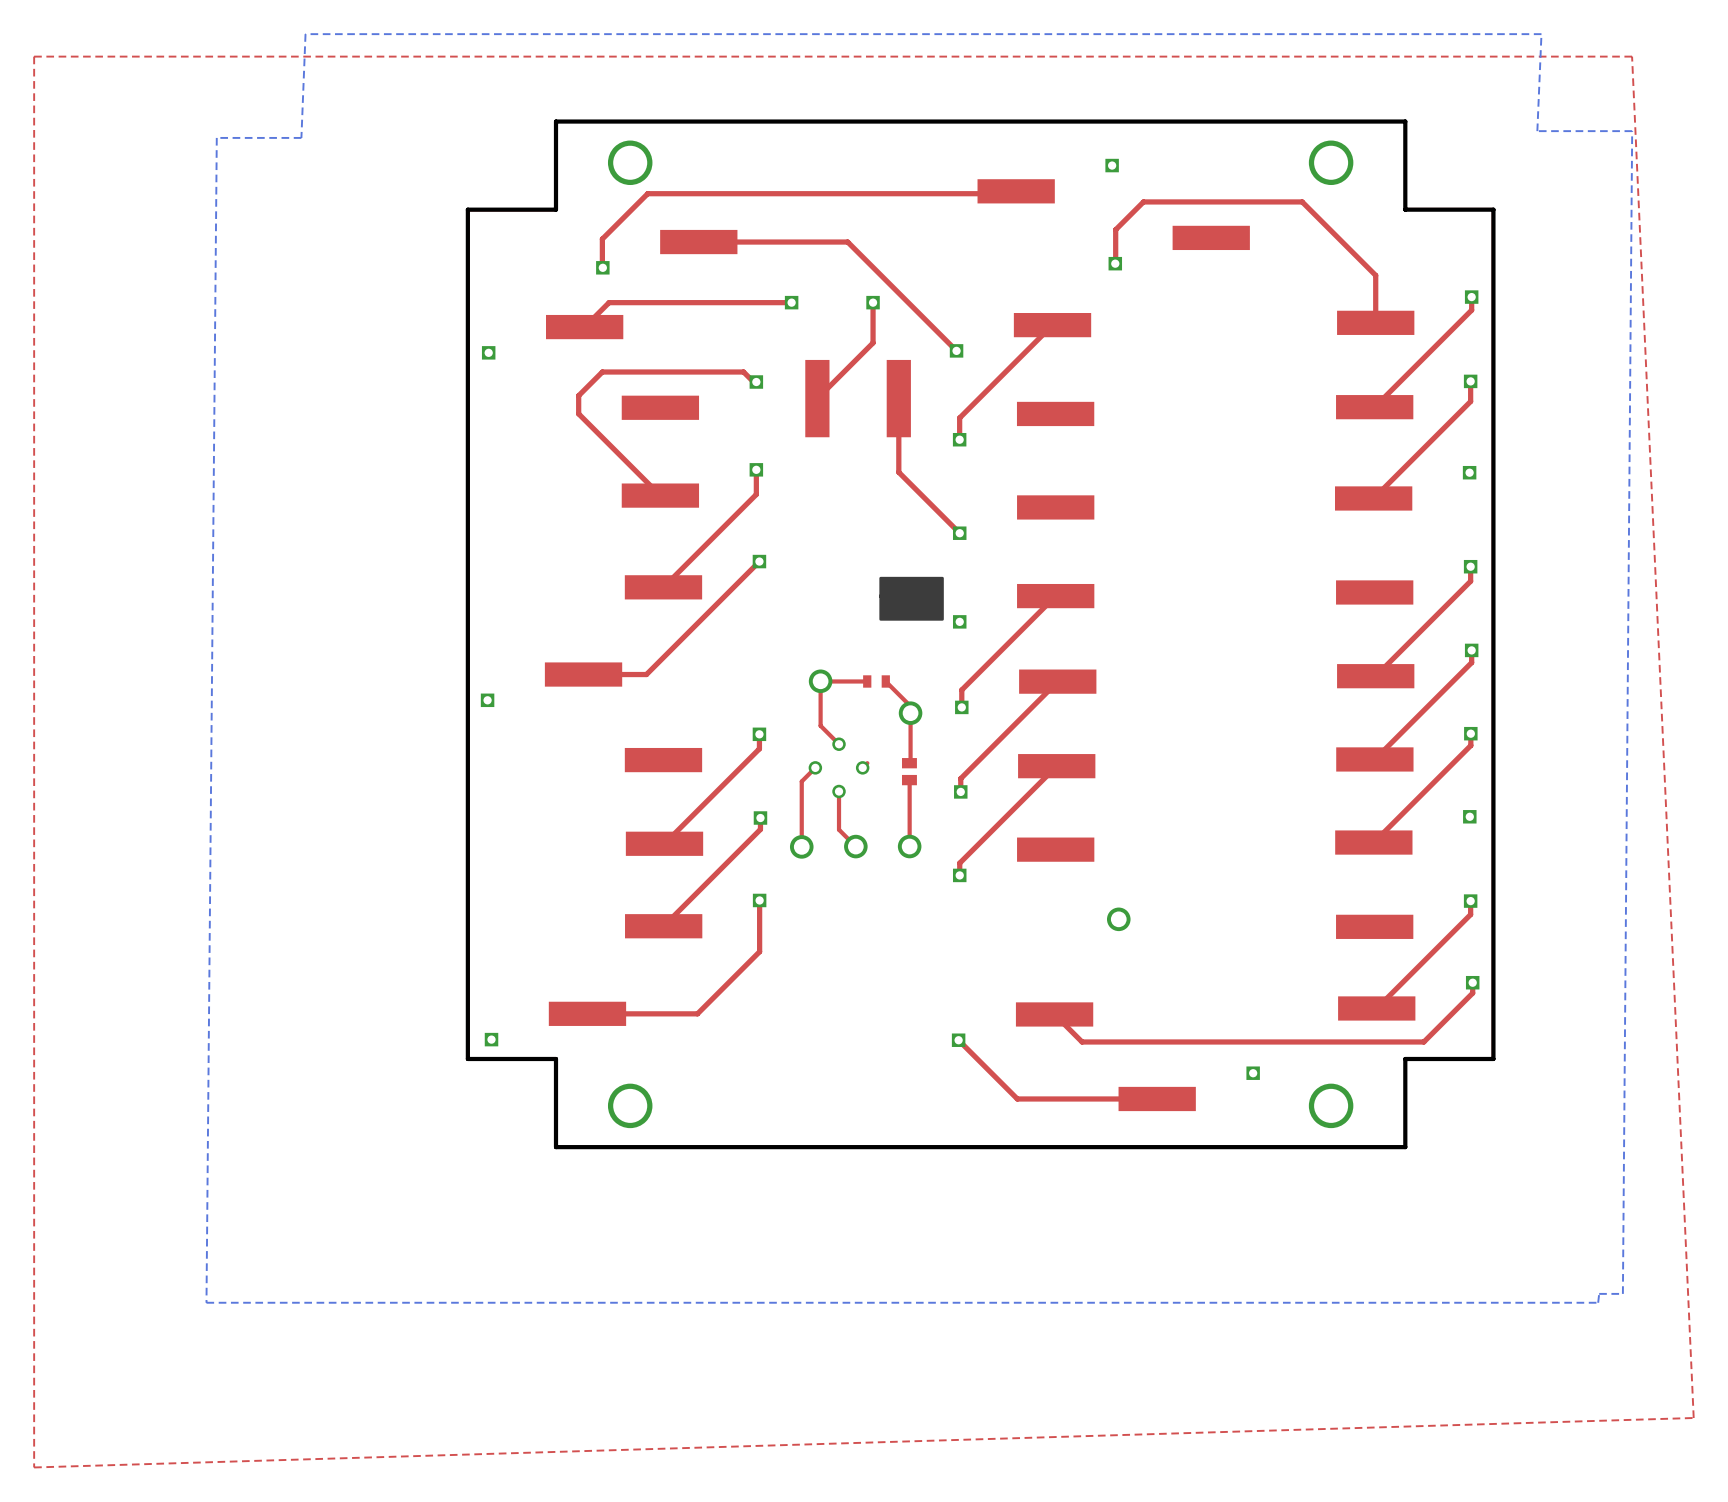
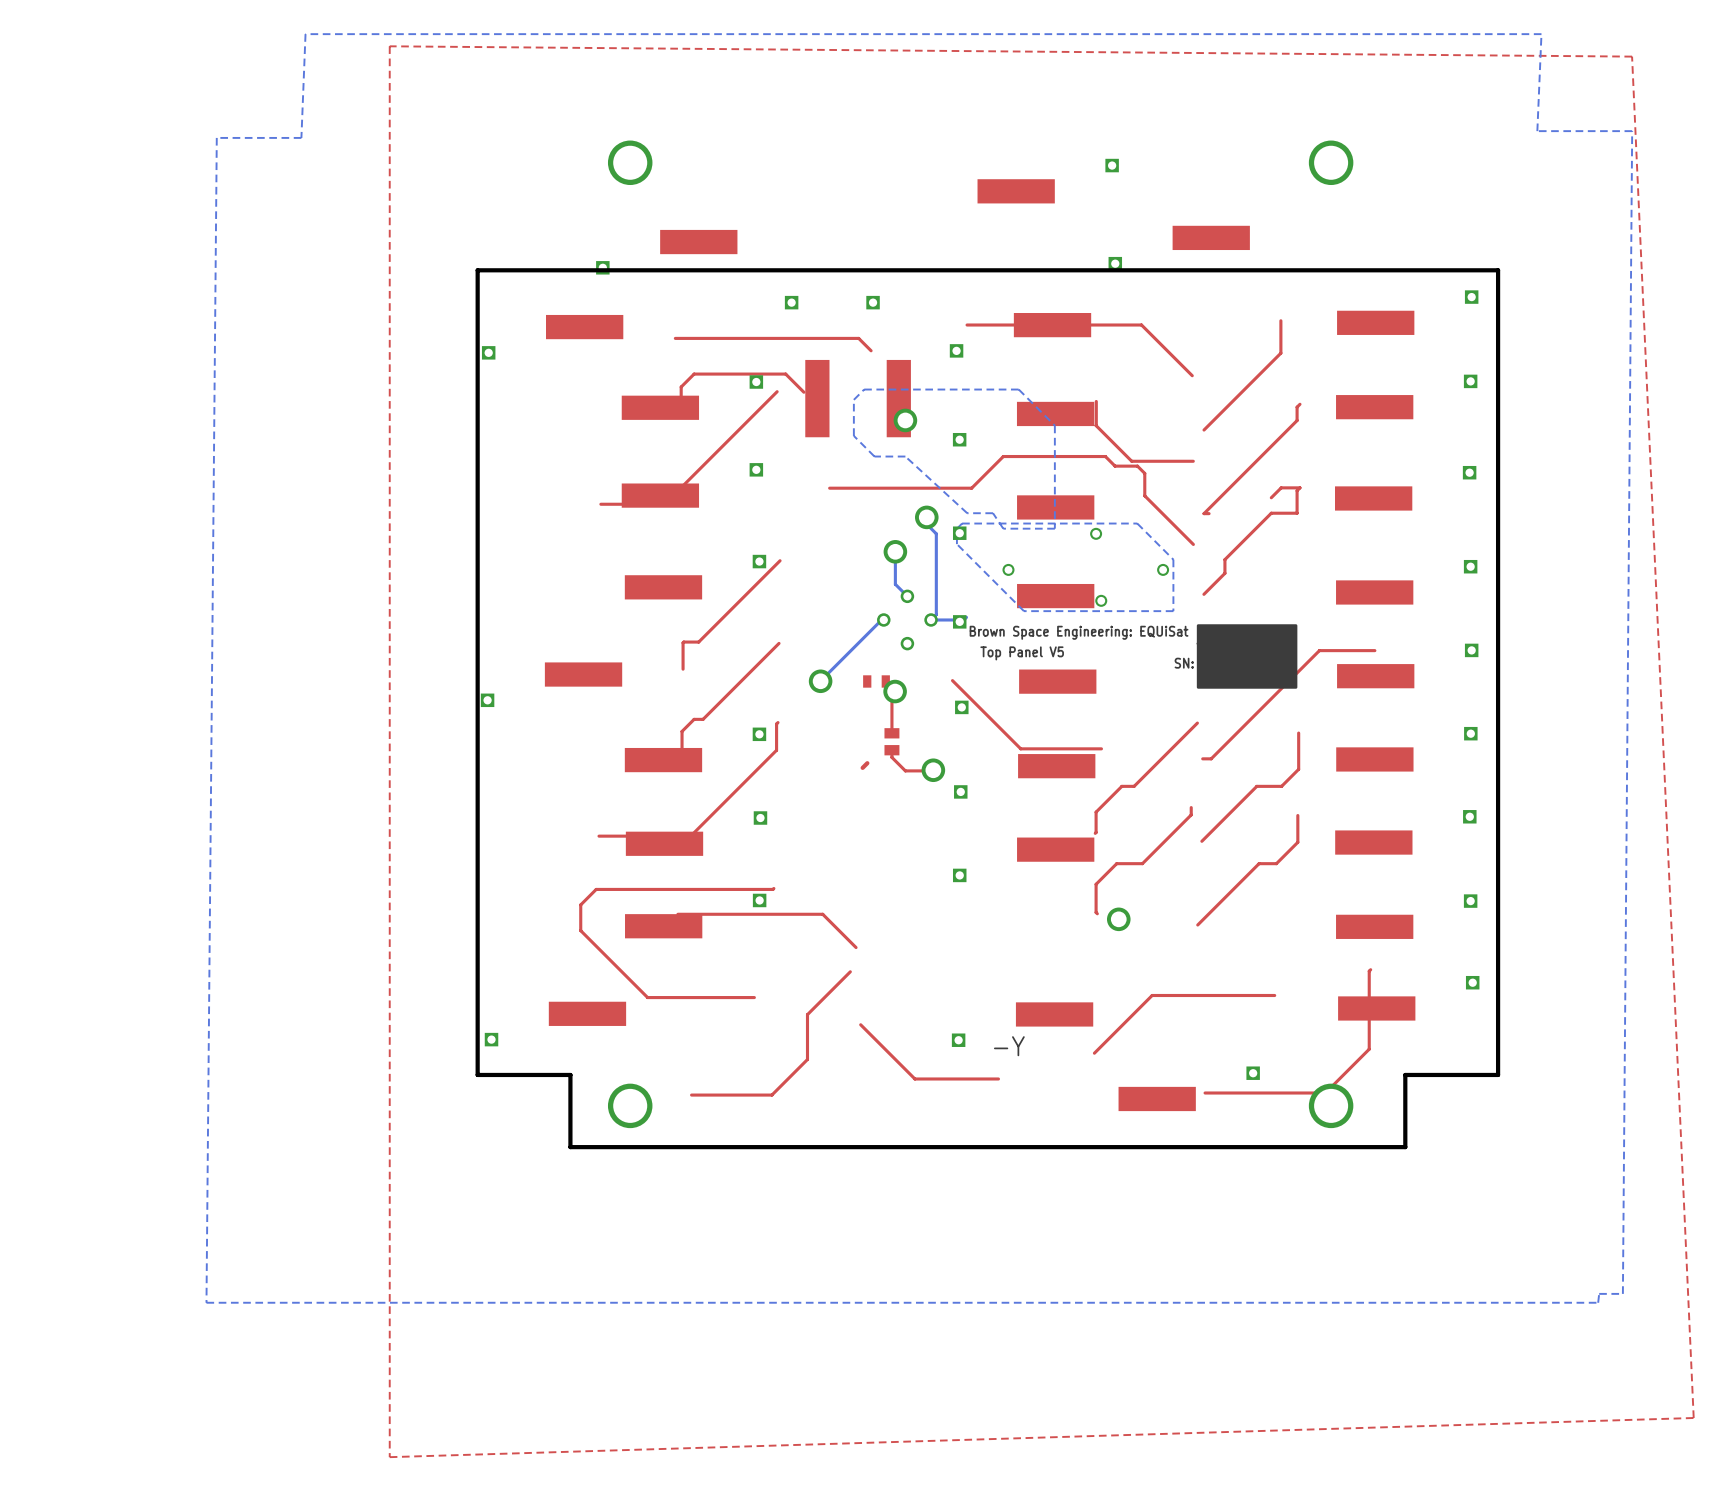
top zone outline: (1632, 56) (34, 56) (34, 1467) (1693, 1417) -> (1632, 56) (389, 46) (389, 1457) (1693, 1417)
top track: (1016, 191) (1013, 193) (647, 193) (602, 239) (602, 267) -> none
top track: (698, 242) (847, 242) (956, 350) -> none
top track: (1115, 263) (1115, 229) (1143, 201) (1302, 201) (1375, 275) (1375, 322) -> none
top track: (1471, 297) (1471, 310) (1374, 407) -> none
top track: (791, 302) (609, 302) (584, 327) -> none
top track: (873, 302) (873, 342) (817, 398) -> none
top track: none -> (1280, 320) (1280, 353) (1204, 430)
top track: none -> (967, 325) (1141, 325) (1192, 375)
top track: (1052, 325) (959, 417) (959, 439) -> none
top track: none -> (675, 338) (858, 338) (871, 350)
top track: (1470, 381) (1470, 401) (1373, 498) -> none
top track: (756, 382) (753, 382) (743, 372) (602, 372) (578, 395) (578, 413) (660, 495) -> none
bottom zone outline: none -> (1018, 389) (864, 389) (853, 399) (853, 435) (874, 456) (905, 456) (967, 513) (993, 513) (1003, 528) (1054, 528) (1054, 425) (1018, 389)
top track: none -> (777, 391) (664, 504) (600, 504)
top track: none -> (803, 392) (785, 374) (694, 374) (681, 387) (681, 417)
top track: (898, 398) (898, 472) (959, 533) -> none
top track: none -> (1096, 401) (1096, 425) (1131, 461) (1193, 461)
top track: none -> (1299, 404) (1297, 407) (1297, 420) (1204, 513) (1209, 513)
part: none -> (905, 420)
top track: (756, 469) (756, 494) (663, 587) -> none
top track: none -> (829, 488) (971, 488) (1003, 456) (1105, 456) (1115, 466) (1137, 466) (1144, 473) (1144, 495) (1193, 544)
top track: none -> (1271, 497) (1281, 487) (1299, 487) (1297, 490) (1297, 513) (1271, 513) (1224, 559) (1224, 573) (1203, 594)
bottom track: none -> (926, 517) (926, 524) (936, 533) (936, 614) (931, 619) (963, 619) (966, 617)
part: none -> (926, 517)
bottom zone outline: none -> (1137, 523) (962, 523) (956, 528) (956, 544) (1023, 611) (1173, 611) (1173, 559) (1137, 523)
via: none -> (1096, 533)
bottom track: none -> (895, 551) (895, 584) (907, 596)
part: none -> (895, 551)
top track: none -> (780, 560) (698, 642) (683, 642) (683, 669)
top track: (759, 561) (646, 674) (583, 674) -> none
top track: (1470, 566) (1470, 581) (1375, 676) -> none
via: none -> (1008, 569)
via: none -> (1163, 569)
drawing: [879, 576, 944, 621] -> none
top track: (1055, 596) (961, 689) (961, 707) -> none
via: none -> (1101, 600)
bottom track: none -> (883, 619) (881, 619) (828, 672)
drawing: none -> [1196, 624, 1298, 689]
text: none -> Brown Space Engineering: EQUiSat (1079, 632)
top track: none -> (779, 643) (703, 719) (694, 719) (682, 731) (682, 748)
top track: none -> (1374, 650) (1319, 650) (1211, 758) (1202, 758)
top track: (1471, 650) (1471, 662) (1374, 759) -> none
text: none -> Top Panel V5 (1022, 653)
text: none -> SN: (1184, 663)
top track: none -> (952, 680) (1020, 748) (1101, 748)
top track: (867, 681) (820, 681) (820, 725) (839, 744) -> none
top track: (885, 681) (910, 706) (909, 763) -> none
top track: (1057, 681) (960, 778) (960, 791) -> none
top track: none -> (895, 691) (891, 691) (891, 733)
part position: (910, 713) -> (895, 691)
top track: none -> (777, 722) (776, 750) (690, 836) (599, 836)
top track: none -> (1197, 723) (1134, 786) (1121, 786) (1096, 812) (1095, 833)
top track: none -> (1298, 733) (1298, 769) (1281, 786) (1256, 786) (1201, 841)
top track: (1470, 733) (1470, 745) (1373, 842) -> none
top track: (759, 734) (759, 748) (664, 843) -> none
top track: none -> (891, 750) (891, 757) (905, 770) (933, 770)
top track: (1056, 766) (959, 863) (959, 875) -> none
top track: (815, 767) (801, 781) (801, 846) -> none
part position: (839, 767) -> (907, 619)
part: none -> (933, 770)
part position: (909, 771) -> (891, 741)
top track: (909, 780) (909, 846) -> none
top track: (839, 791) (839, 829) (855, 846) -> none
top track: none -> (1191, 807) (1191, 814) (1142, 863) (1116, 863) (1096, 884) (1097, 913)
top track: none -> (1297, 815) (1297, 842) (1276, 863) (1259, 863) (1197, 924)
top track: (760, 818) (760, 829) (663, 926) -> none
part: (801, 846) -> none
part: (855, 846) -> none
part: (909, 846) -> none
top track: none -> (773, 888) (596, 889) (580, 904) (580, 930) (647, 997) (754, 997)
top track: (759, 900) (759, 951) (697, 1013) (587, 1013) -> none
top track: (1470, 901) (1470, 914) (1376, 1008) -> none
top track: none -> (677, 914) (822, 914) (856, 947)
top track: none -> (1370, 969) (1369, 1049) (1325, 1093) (1205, 1093)
top track: none -> (850, 971) (807, 1014) (807, 1059) (771, 1095) (691, 1095)
top track: (1472, 982) (1472, 993) (1423, 1041) (1082, 1041) (1054, 1014) -> none
top track: none -> (1274, 995) (1152, 995) (1094, 1053)
top track: none -> (860, 1024) (914, 1078) (998, 1078)
top track: (958, 1040) (1017, 1098) (1157, 1098) -> none
text: none -> -Y (1009, 1046)
board edge: (1405, 1074) (1405, 1058) (1493, 1058) (1493, 209) (1405, 209) (1405, 121) (555, 121) (555, 209) (467, 209) (467, 1058) (555, 1058) (555, 1147) (570, 1147) -> (1405, 1074) (1498, 1074) (1498, 270) (477, 270) (477, 1074) (570, 1074) (570, 1147)

